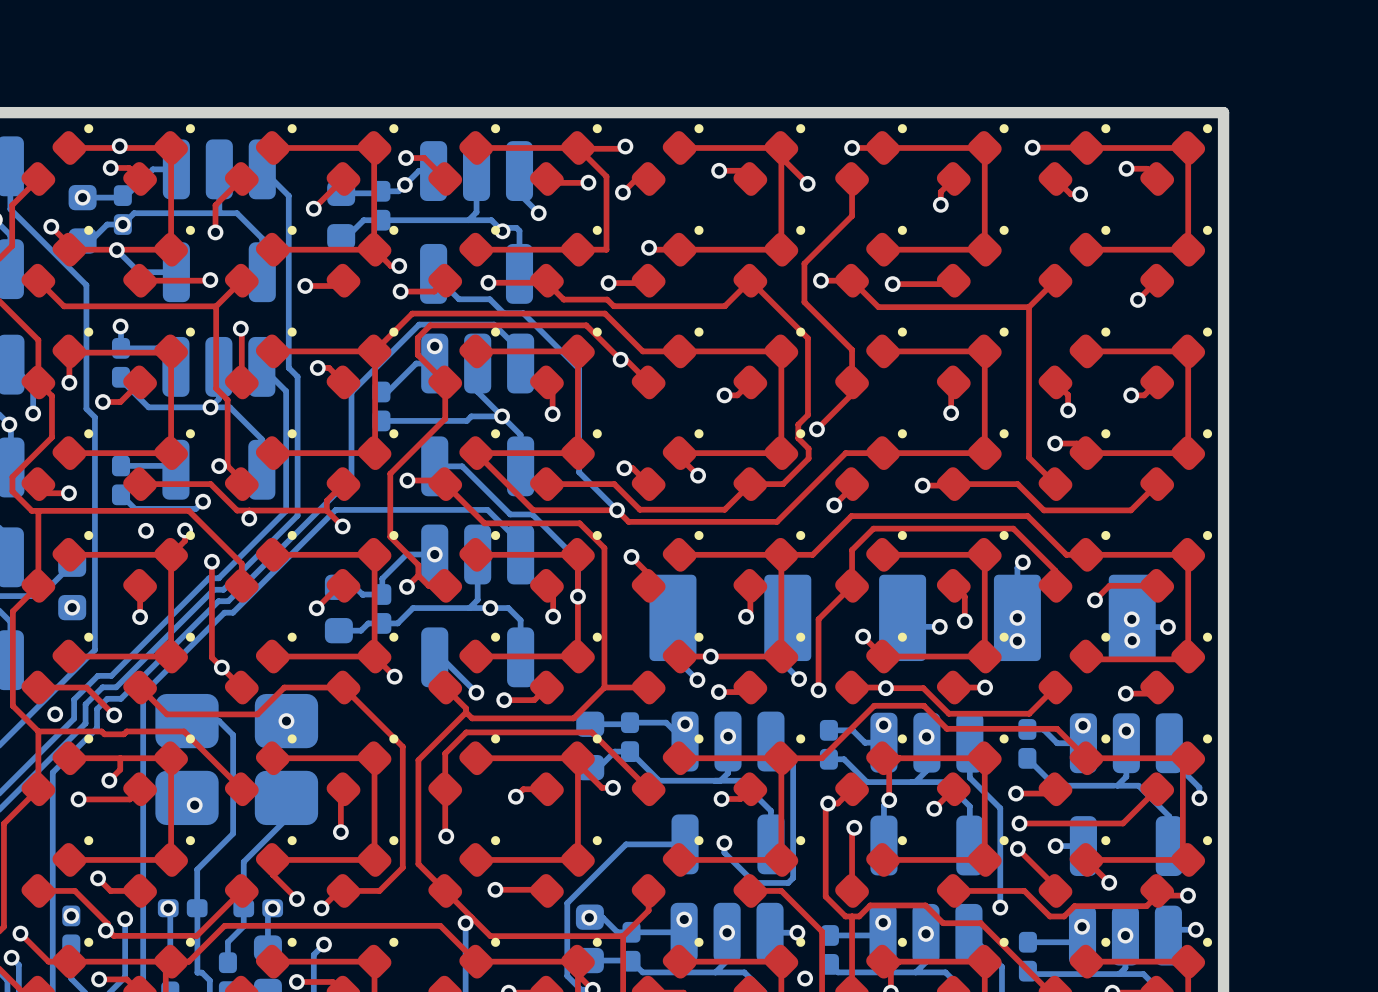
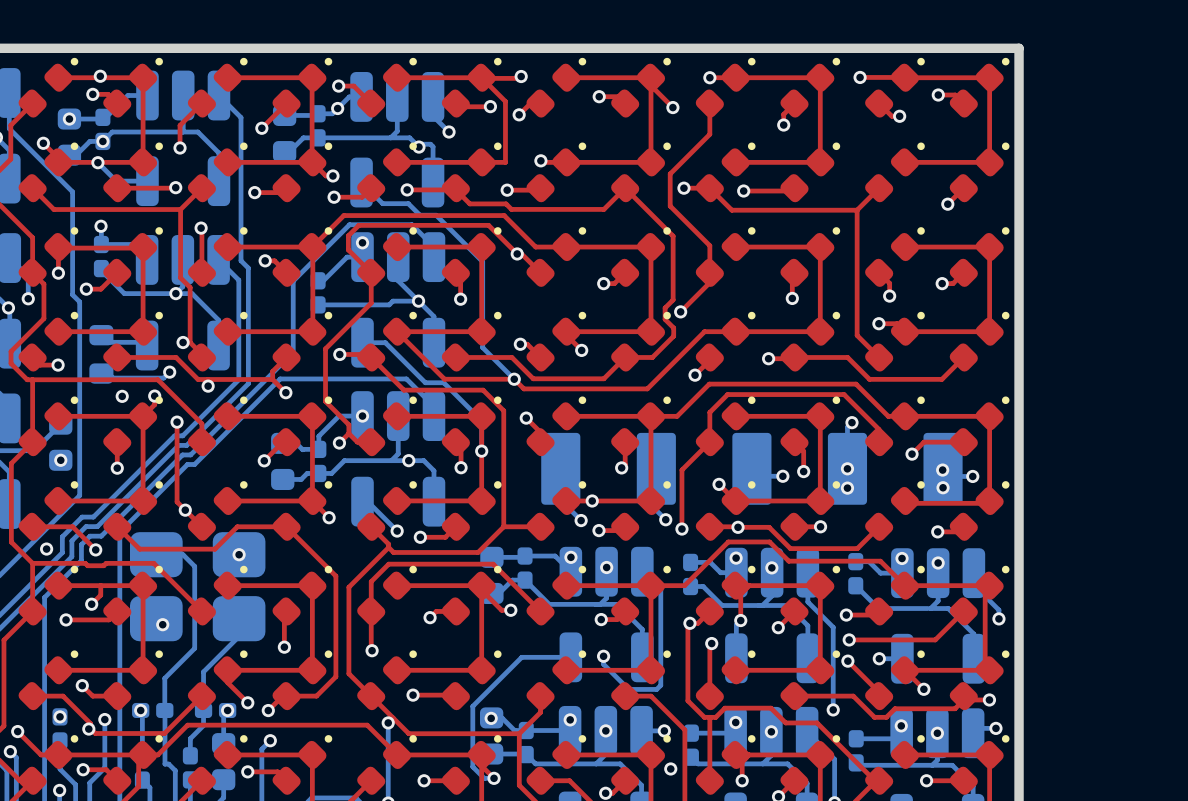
part footprint: [111, 455, 131, 506] -> [89, 325, 114, 384]

